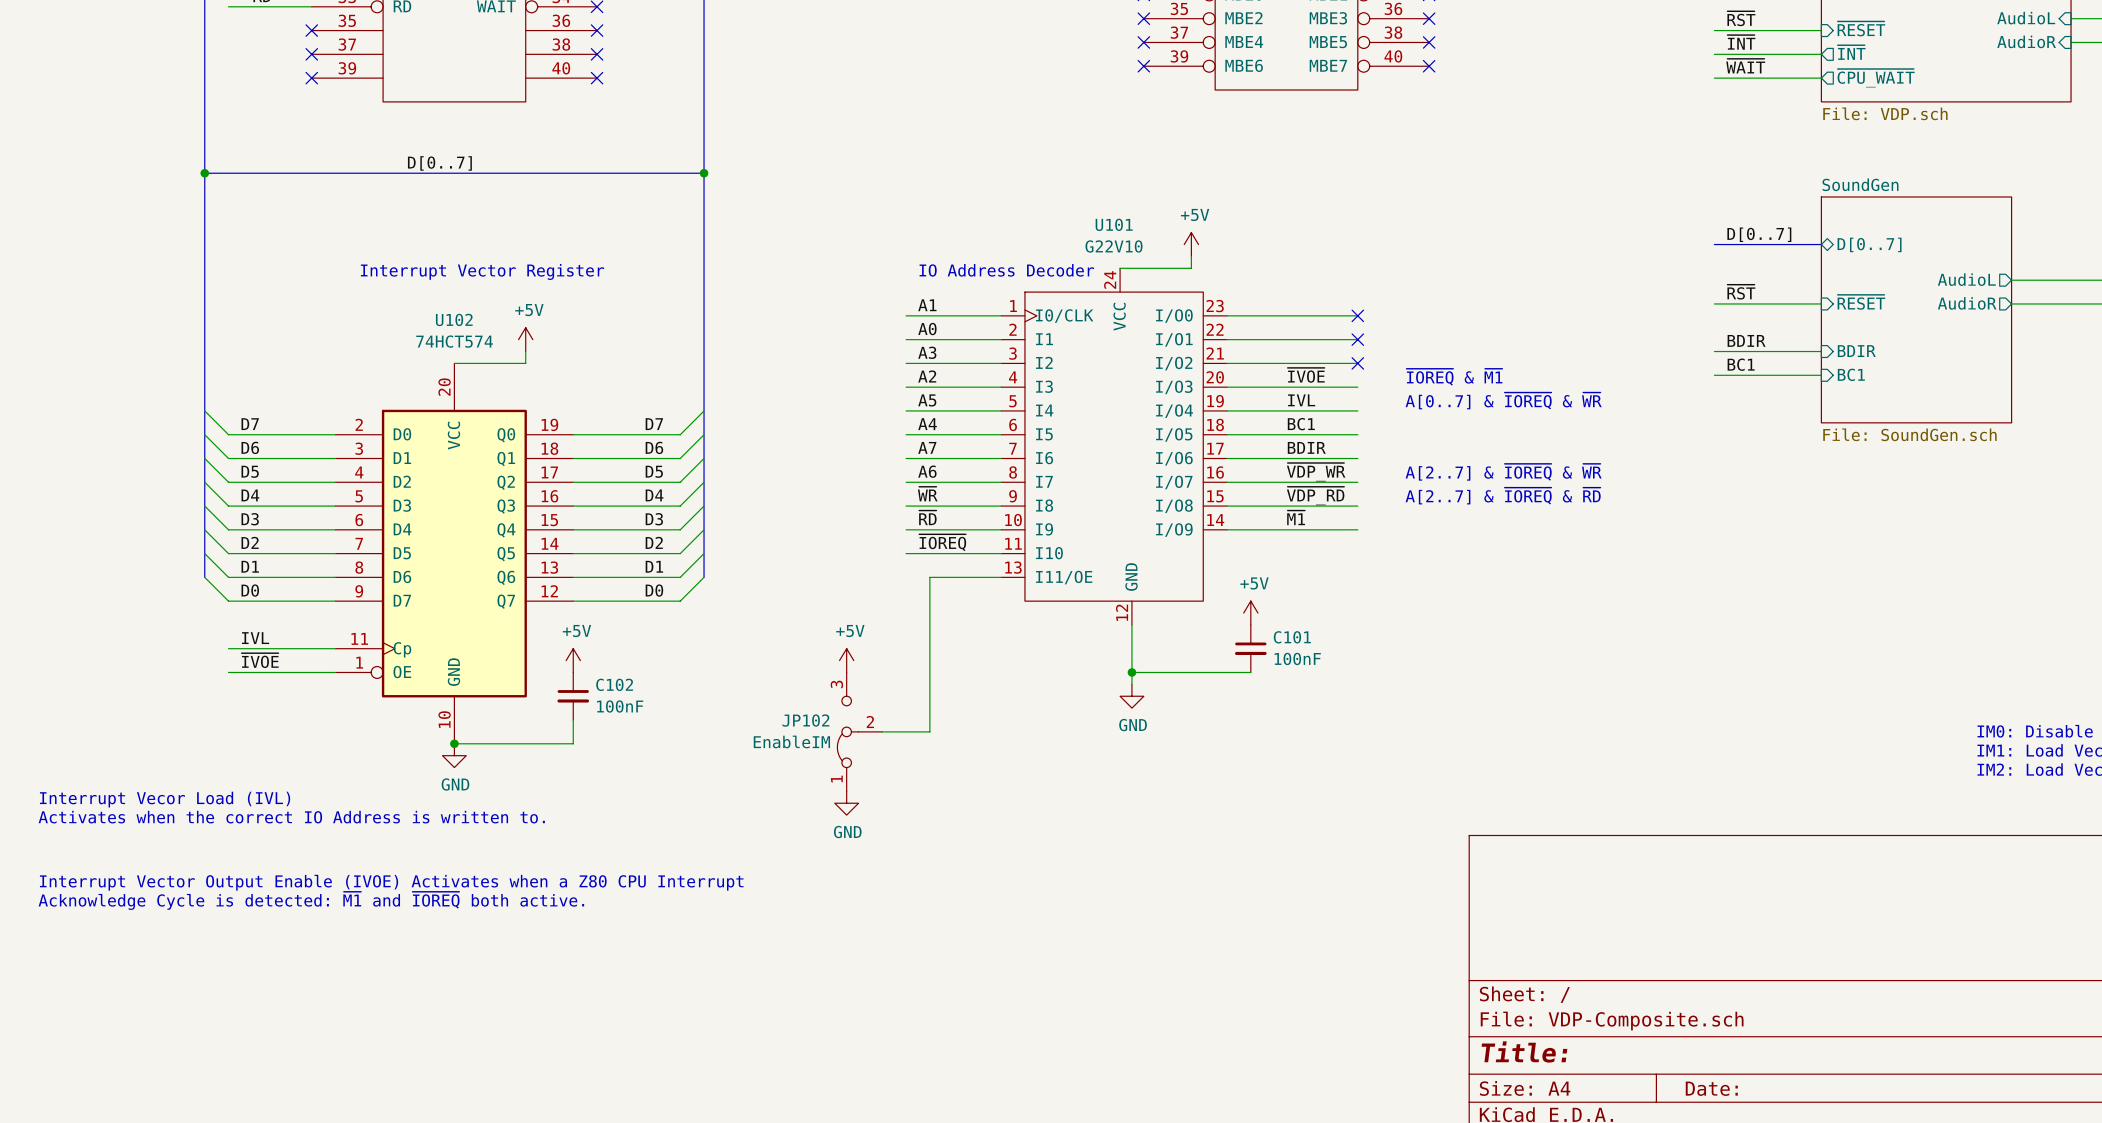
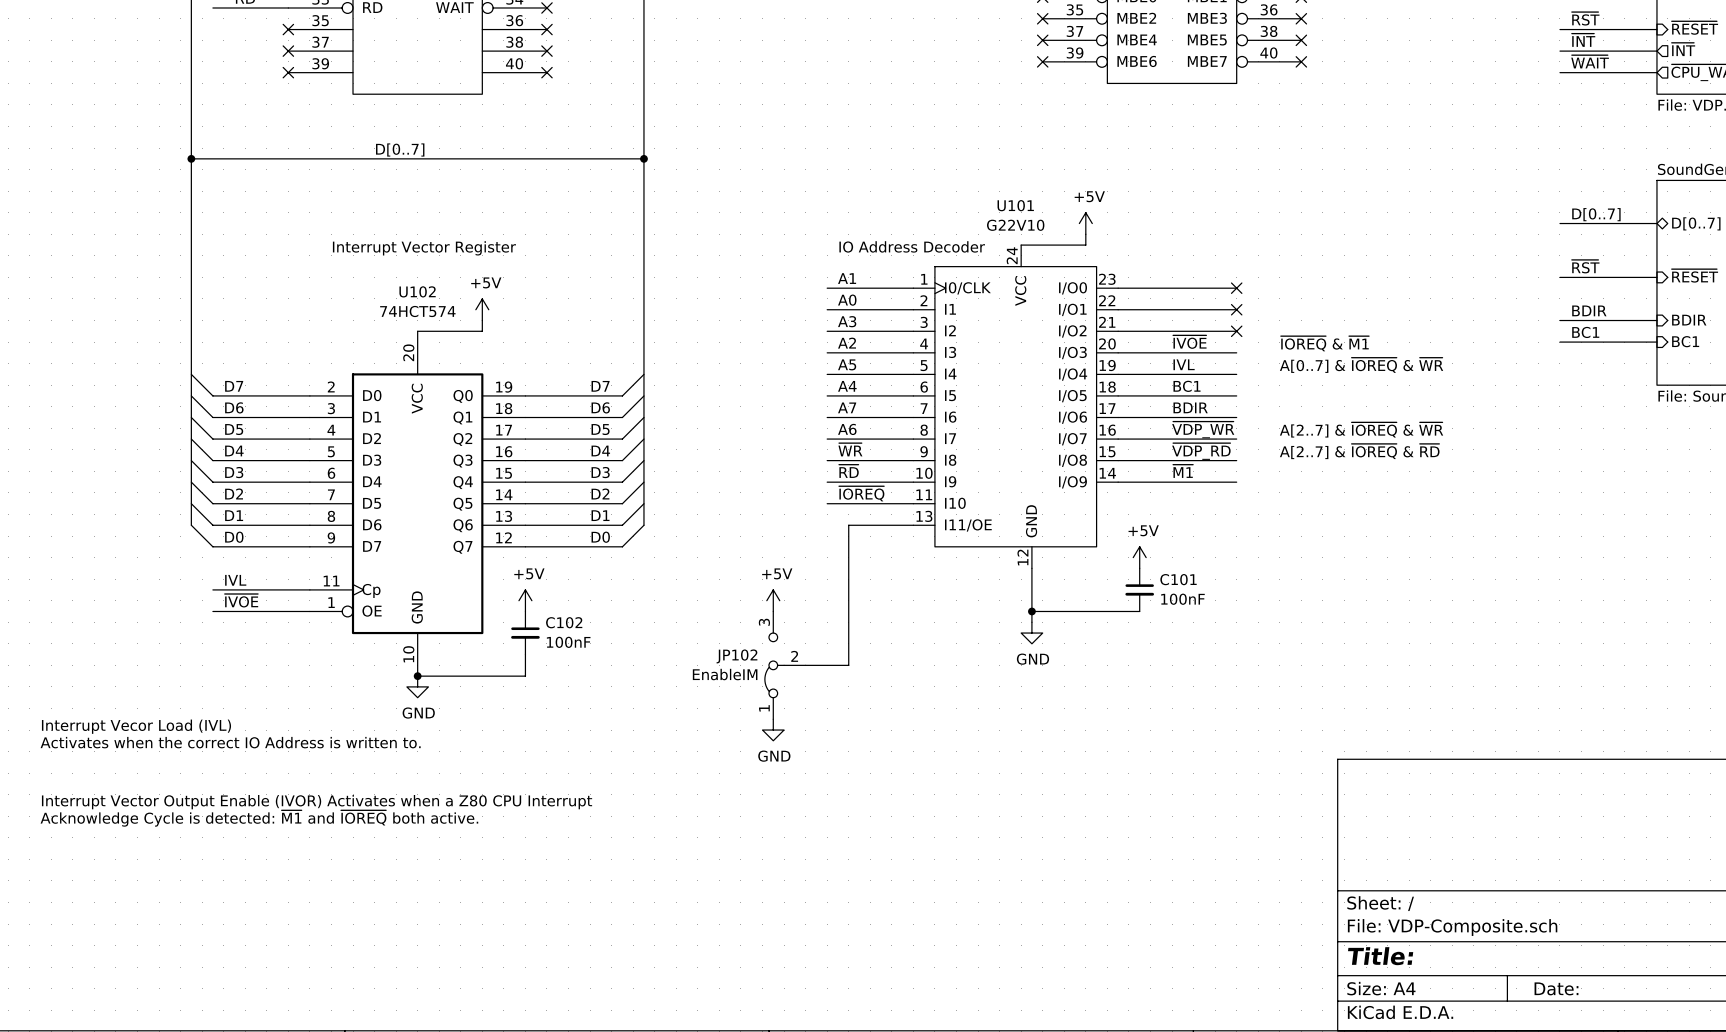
text: Interrupt Vector Output Enable (IVOE) Activates when a Z80 CPU Interrupt (391, 882) -> Interrupt Vector Output Enable (IVOR) Activates when a Z80 CPU Interrupt (317, 802)

